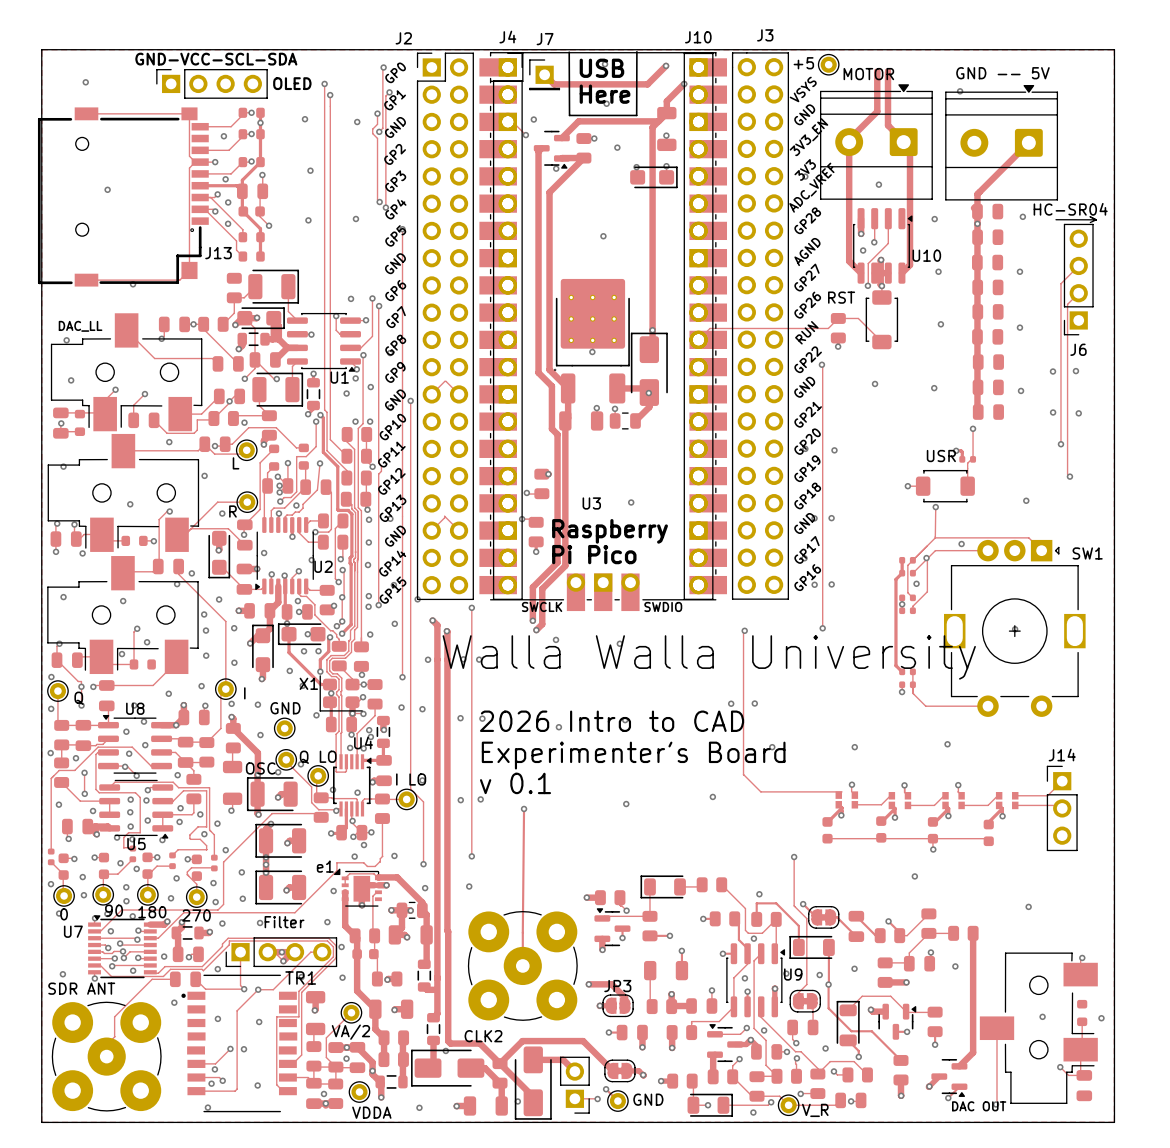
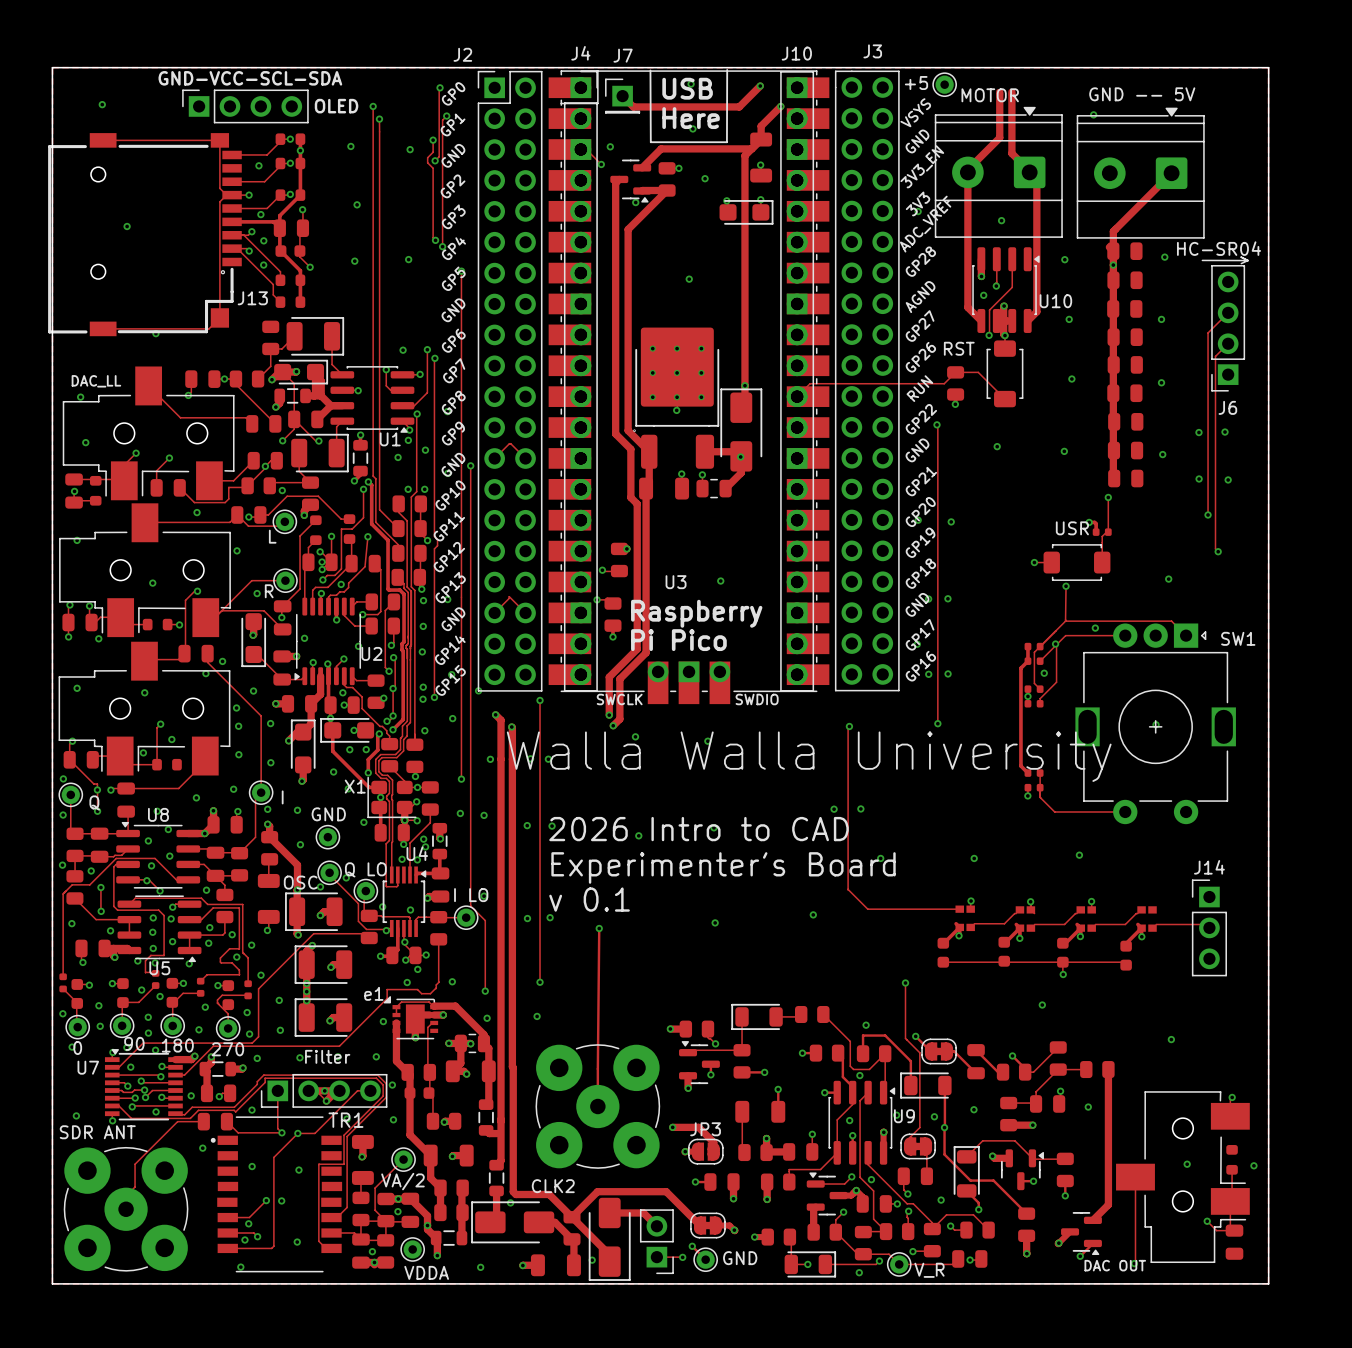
track: (1062, 781) (1047, 795) (1015, 795) -> none
part rotation: 0° (846, 799) -> 90° clockwise (965, 918)
part rotation: 0° (899, 800) -> 90° clockwise (1025, 919)
part rotation: 0° (953, 800) -> 90° clockwise (1086, 919)
part rotation: 0° (1007, 800) -> 90° clockwise (1147, 919)

